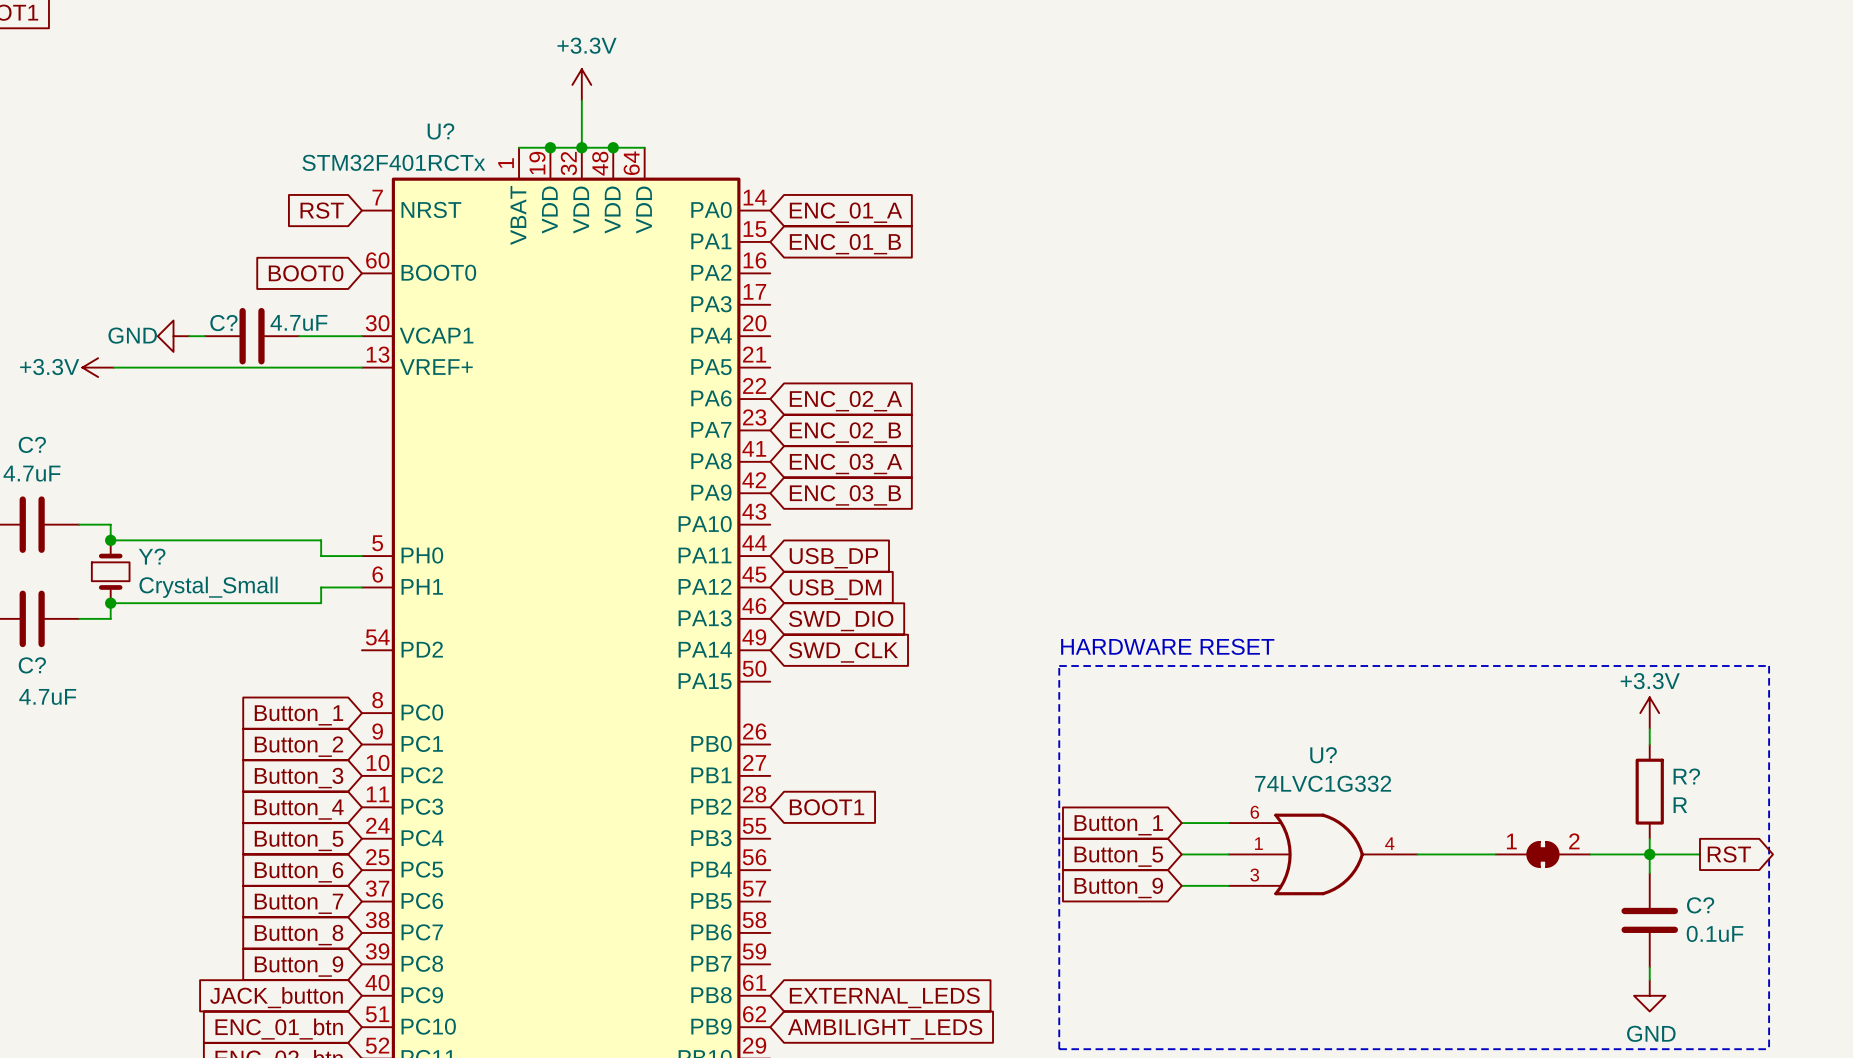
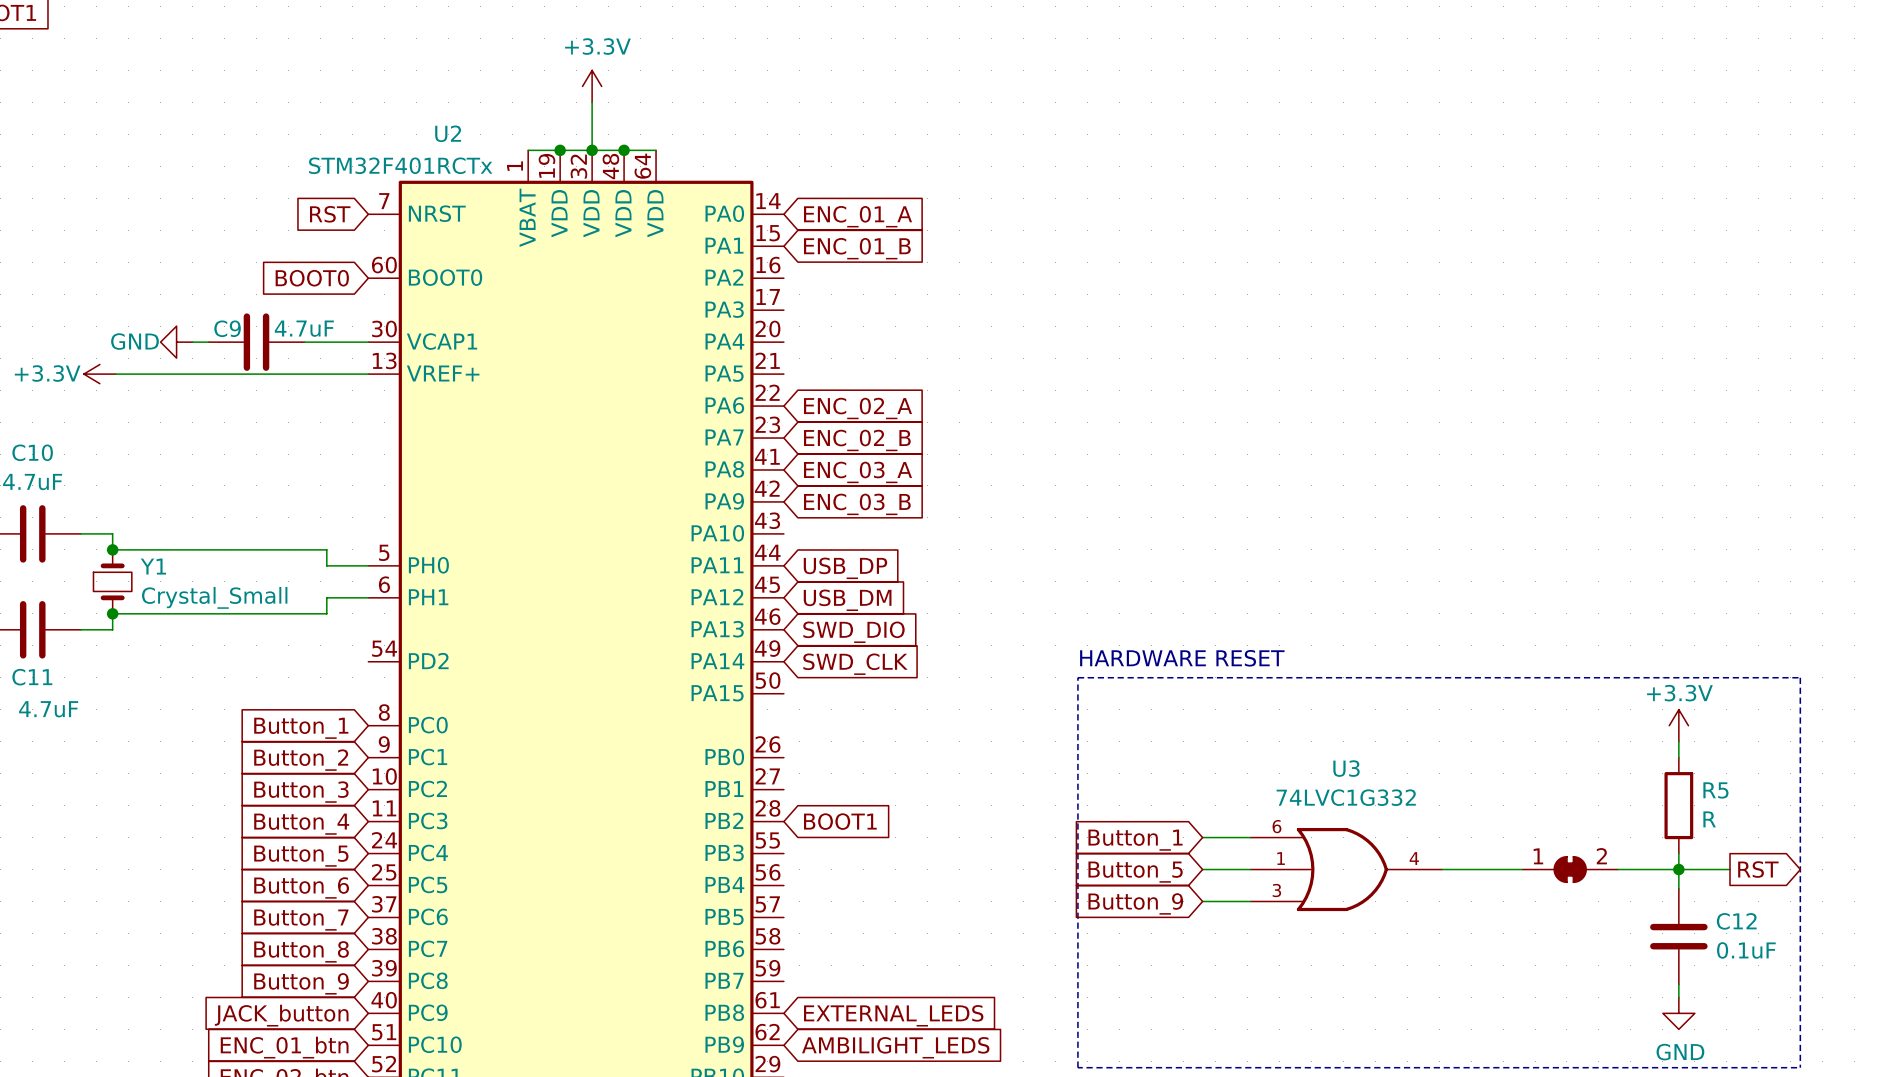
U? name: U? (440, 131) -> U2 (448, 133)
C? name: C? (223, 323) -> C9 (227, 328)
C? name: C? (32, 444) -> C10 (32, 452)
Y? name: Y? (152, 556) -> Y1 (153, 566)
C? name: C? (32, 665) -> C11 (32, 677)
U? name: U? (1323, 755) -> U3 (1346, 768)
R? name: R? (1686, 776) -> R5 (1715, 790)
C? name: C? (1700, 905) -> C12 (1736, 921)

